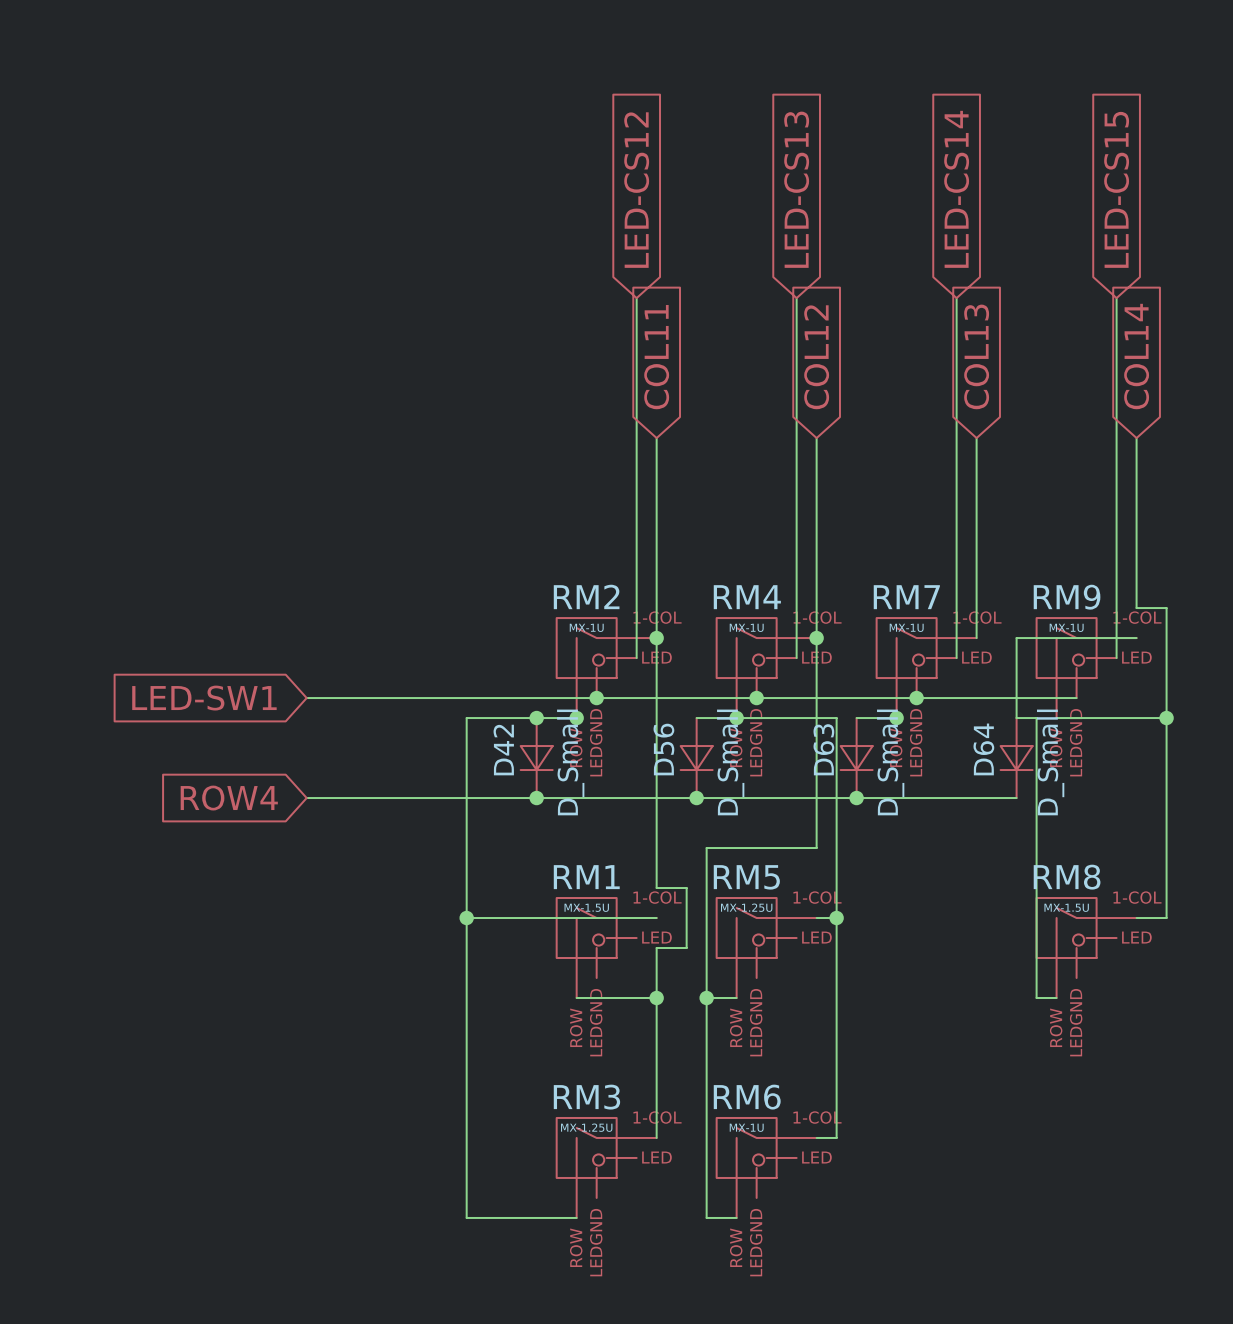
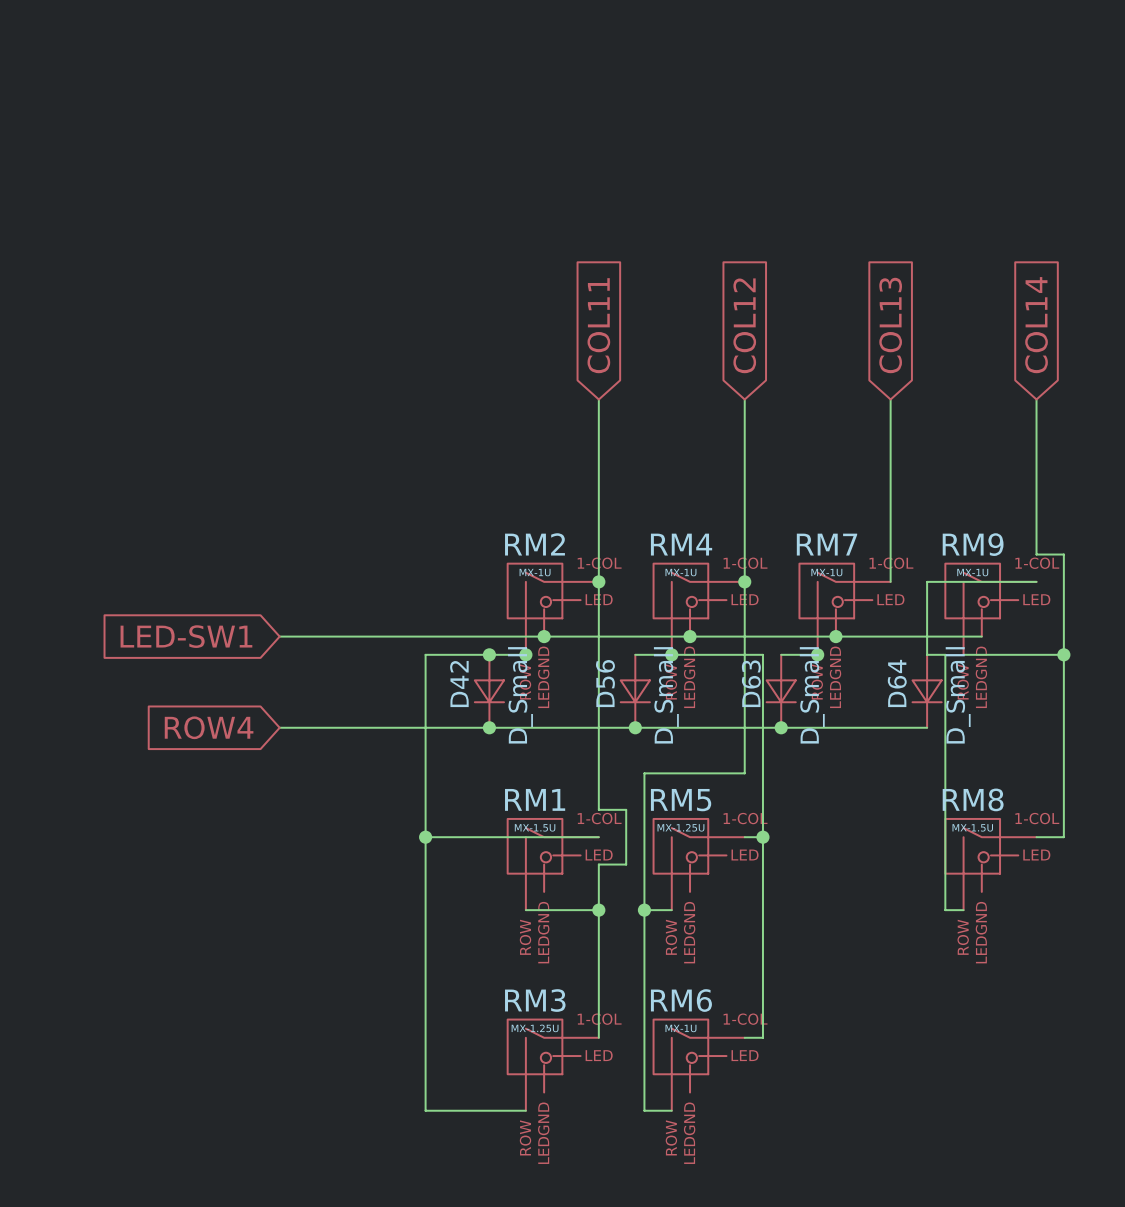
global label: LED-CS13 (796, 189) -> none
global label: LED-CS14 (956, 189) -> none
global label: LED-CS15 (1116, 189) -> none
global label: LED-CS12 (636, 190) -> none
wire: (636, 298) (636, 658) -> none
wire: (796, 298) (796, 658) -> none
wire: (956, 298) (956, 658) -> none
wire: (1116, 298) (1116, 658) -> none

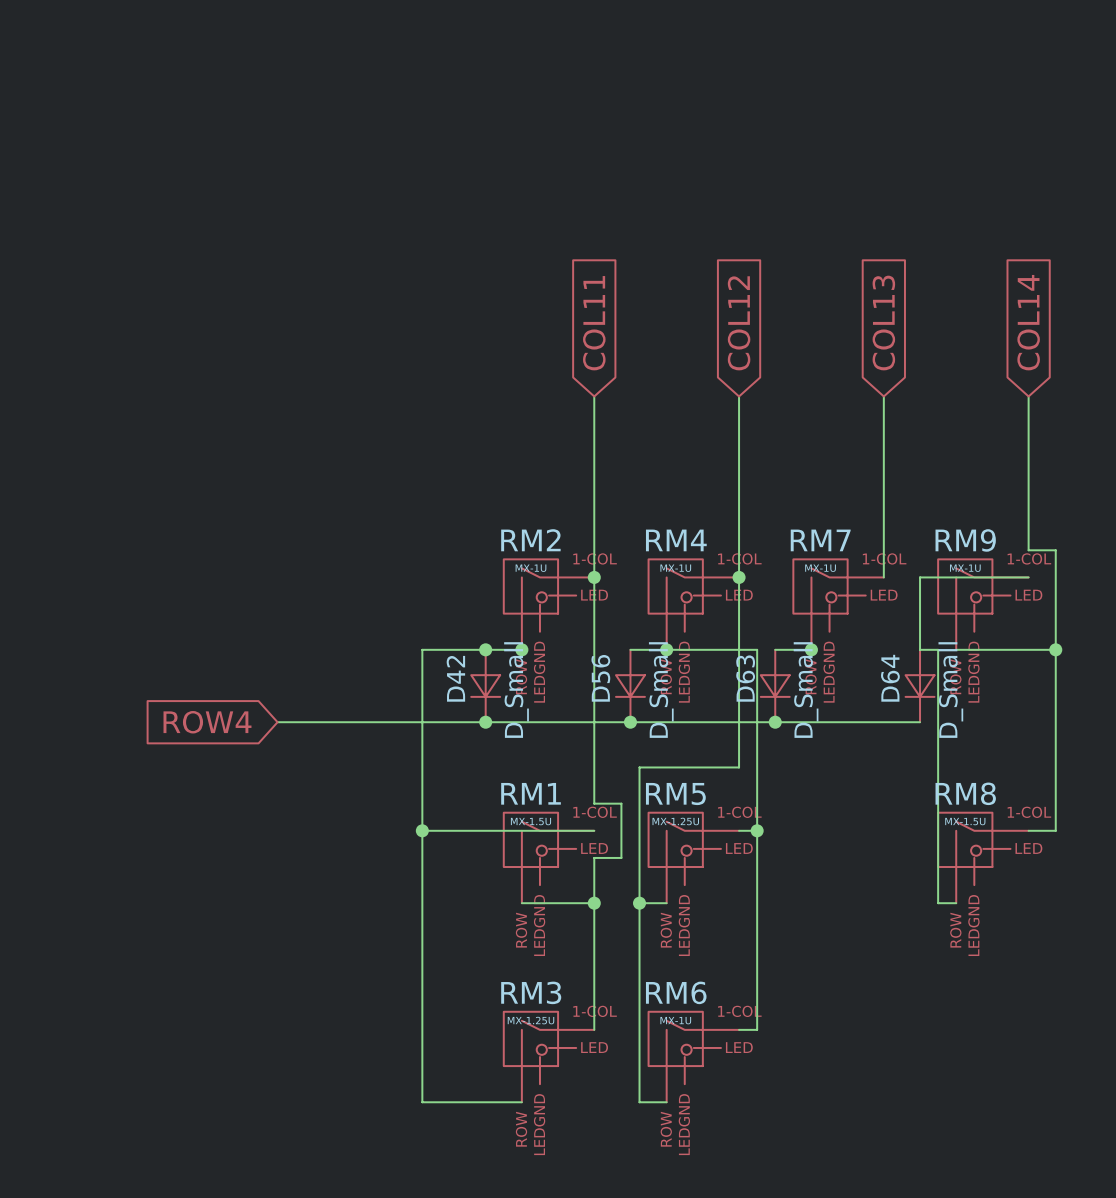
global label: LED-SW1 (186, 636) -> none
wire: (279, 636) (981, 636) -> none
junction: (544, 636) -> none
junction: (690, 636) -> none
junction: (835, 636) -> none

